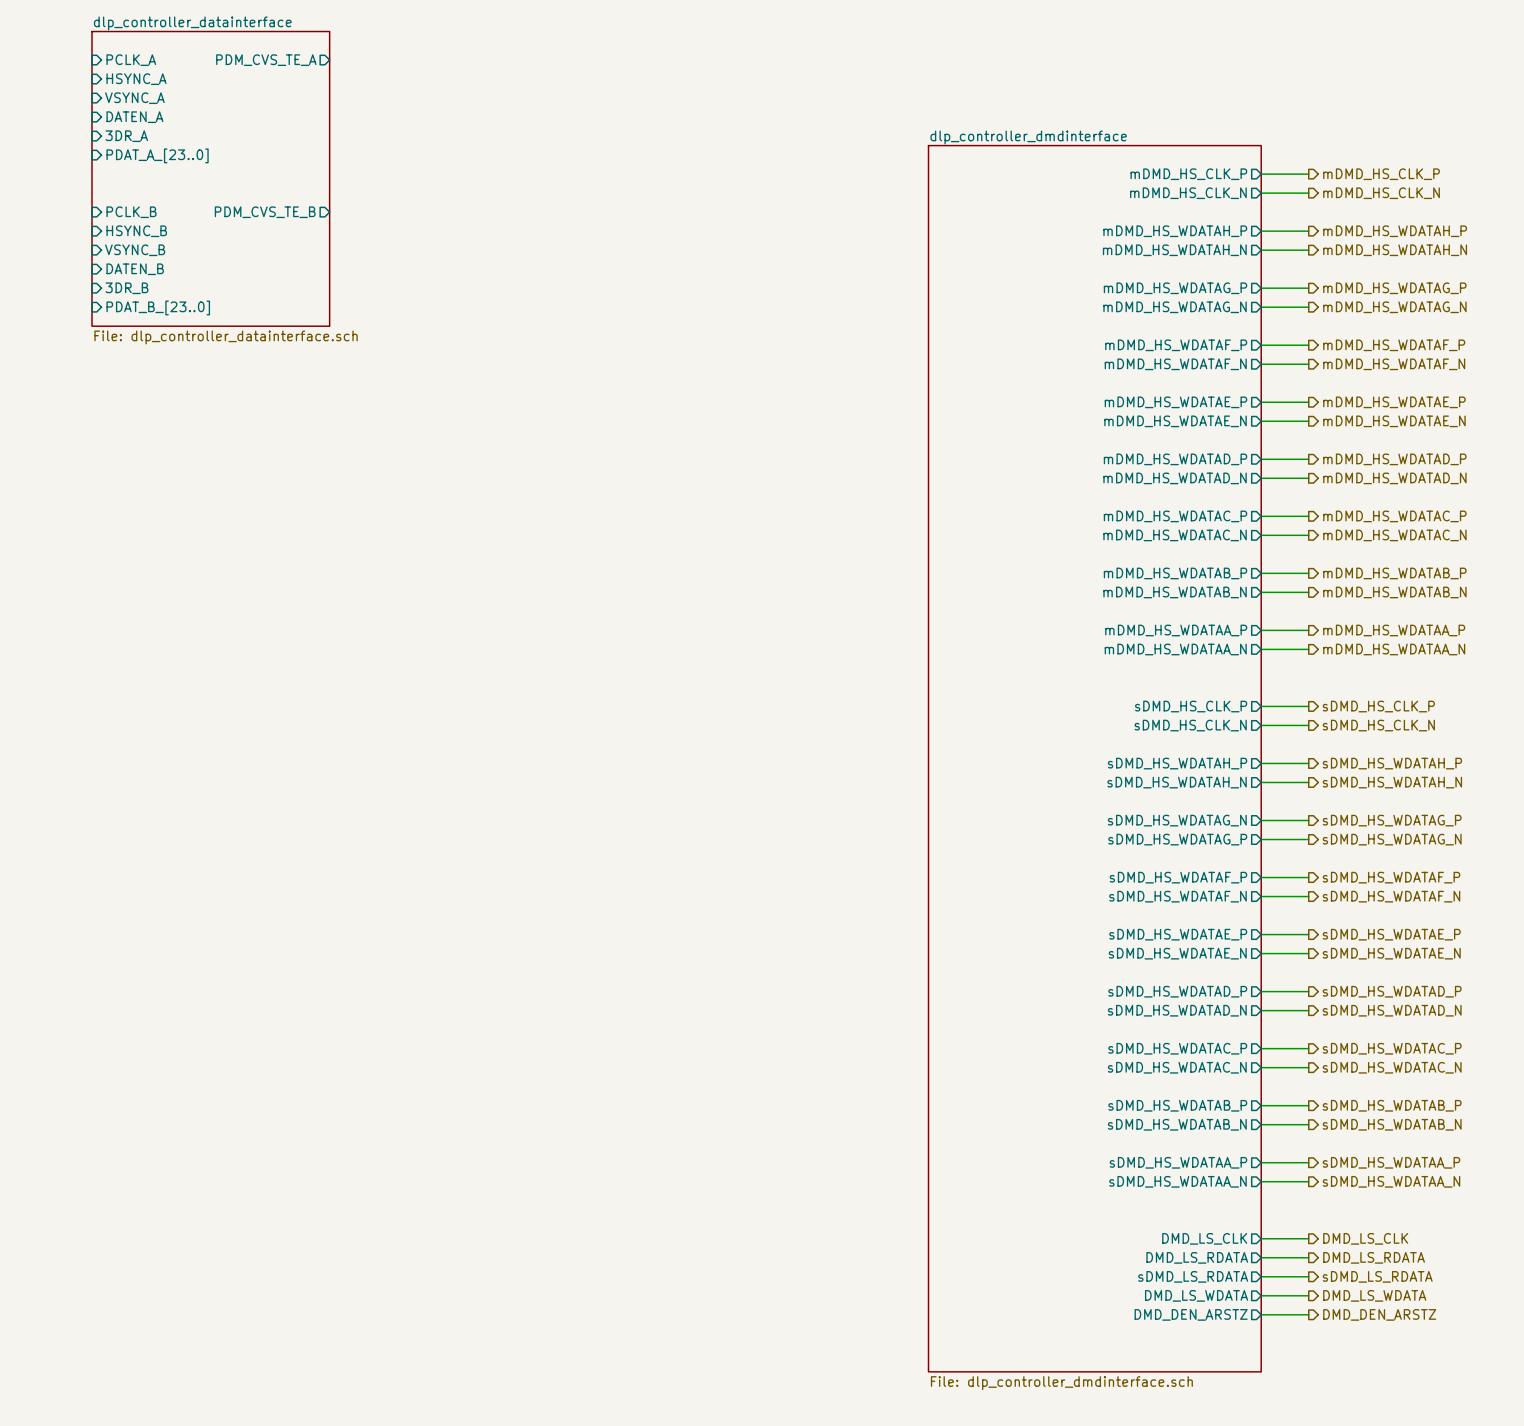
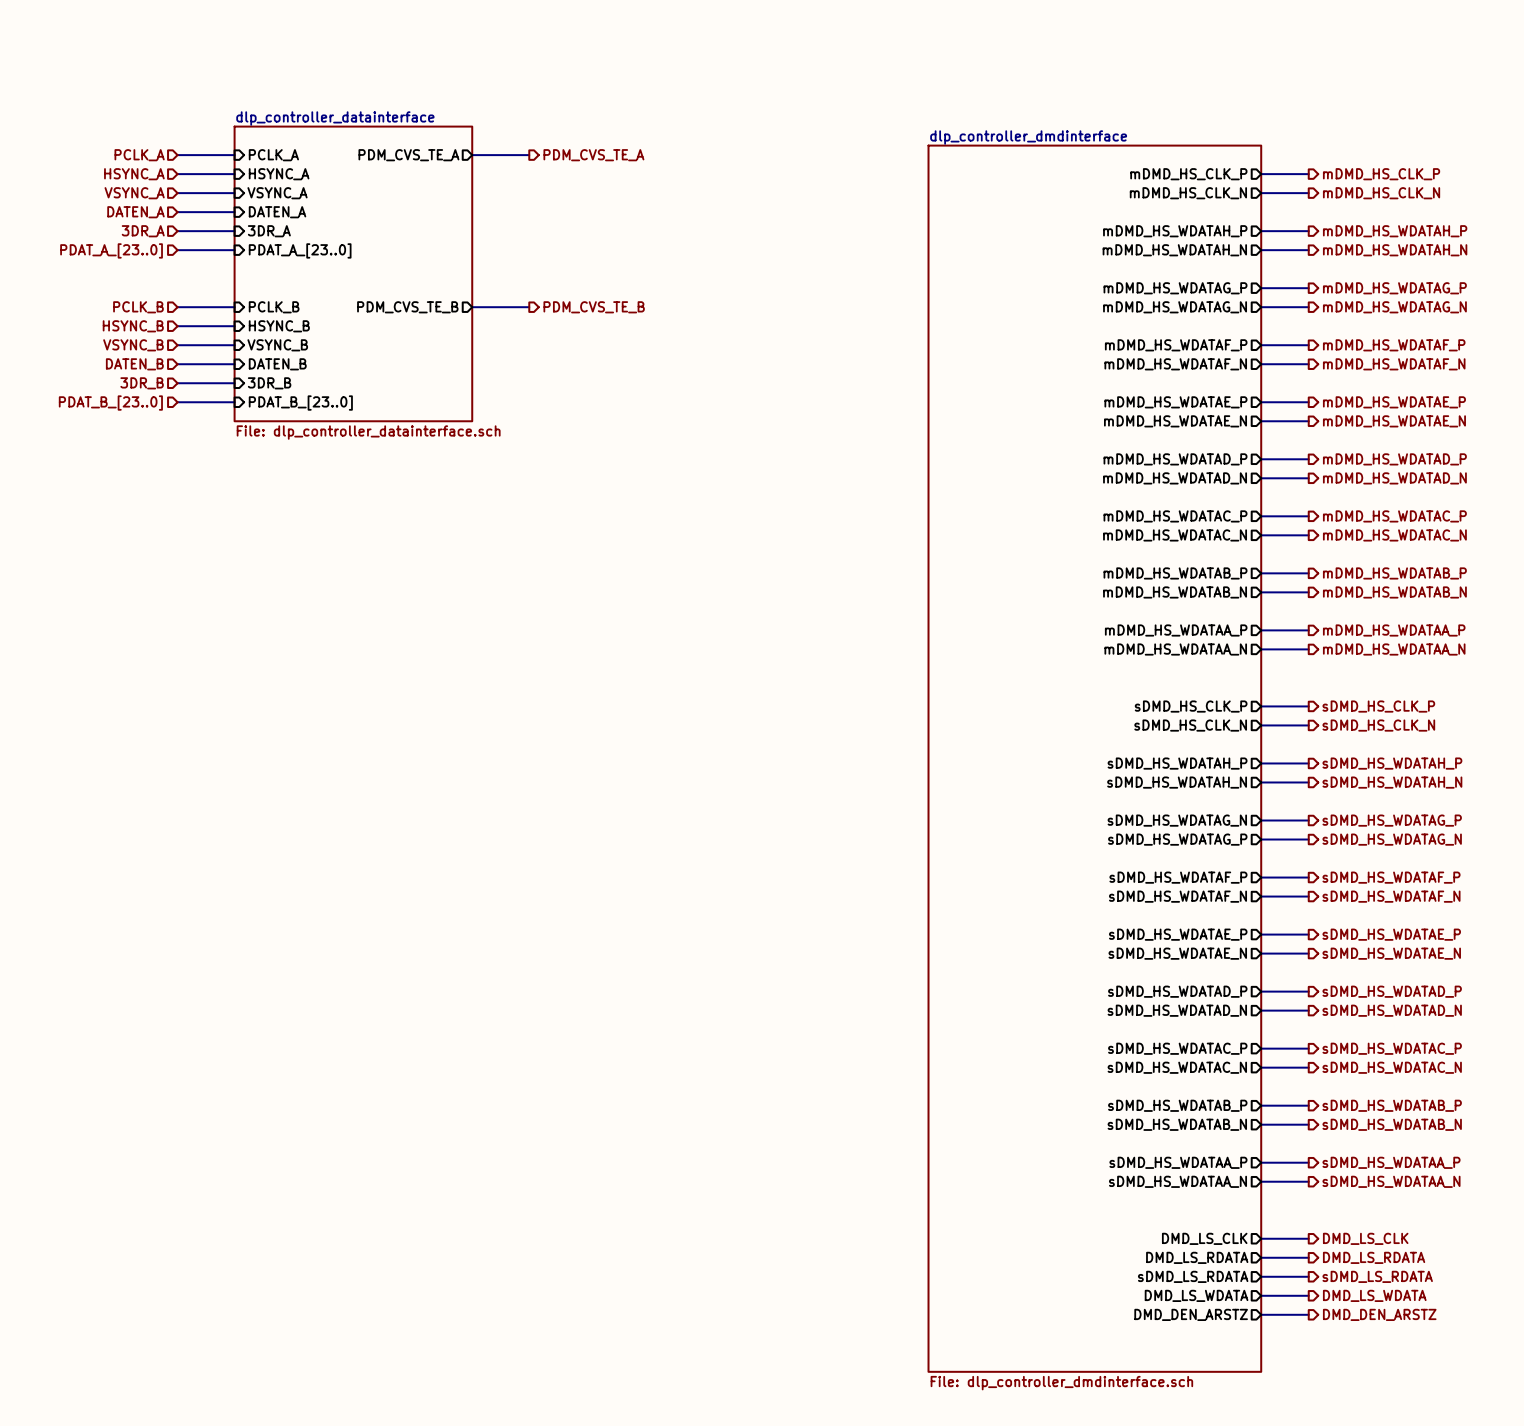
sheet pin position: PCLK_A (131, 60) -> PCLK_A (273, 155)
sheet pin position: PDM_CVS_TE_A (266, 60) -> PDM_CVS_TE_A (408, 155)
sheet pin position: HSYNC_A (136, 79) -> HSYNC_A (279, 174)
sheet pin position: VSYNC_A (134, 98) -> VSYNC_A (277, 193)
sheet pin position: DATEN_A (134, 117) -> DATEN_A (277, 212)
sheet pin position: 3DR_A (126, 136) -> 3DR_A (269, 231)
hierarchical label: none -> PCLK_A (139, 155)
sheet pin position: PDAT_A_[23..0] (157, 155) -> PDAT_A_[23..0] (300, 250)
wire: none -> (177, 155) (234, 155)
wire: none -> (472, 155) (529, 155)
hierarchical label: none -> PDM_CVS_TE_A (593, 155)
hierarchical label: none -> HSYNC_A (134, 174)
wire: none -> (177, 174) (234, 174)
sheet dlp_controller_datainterface position: (210, 178) -> (353, 273)
hierarchical label: none -> VSYNC_A (134, 193)
wire: none -> (177, 193) (234, 193)
sheet pin position: PCLK_B (131, 212) -> PCLK_B (274, 307)
hierarchical label: none -> DATEN_A (135, 212)
wire: none -> (177, 212) (234, 212)
sheet pin position: PDM_CVS_TE_B (265, 212) -> PDM_CVS_TE_B (407, 307)
sheet pin position: HSYNC_B (136, 231) -> HSYNC_B (279, 326)
hierarchical label: none -> 3DR_A (143, 231)
wire: none -> (177, 231) (234, 231)
hierarchical label: none -> PDAT_A_[23..0] (111, 250)
sheet pin position: VSYNC_B (135, 250) -> VSYNC_B (277, 345)
bus: none -> (177, 250) (234, 250)
sheet pin position: DATEN_B (135, 269) -> DATEN_B (277, 364)
sheet pin position: 3DR_B (127, 288) -> 3DR_B (269, 383)
hierarchical label: none -> PCLK_B (138, 307)
sheet pin position: PDAT_B_[23..0] (158, 307) -> PDAT_B_[23..0] (300, 403)
wire: none -> (177, 307) (234, 307)
wire: none -> (472, 307) (529, 307)
hierarchical label: none -> PDM_CVS_TE_B (594, 307)
hierarchical label: none -> HSYNC_B (133, 326)
hierarchical label: none -> VSYNC_B (133, 345)
wire: none -> (177, 345) (234, 345)
hierarchical label: none -> DATEN_B (134, 364)
wire: none -> (177, 364) (234, 364)
hierarchical label: none -> 3DR_B (142, 383)
wire: none -> (177, 383) (234, 383)
bus: none -> (177, 402) (234, 402)
hierarchical label: none -> PDAT_B_[23..0] (110, 403)

